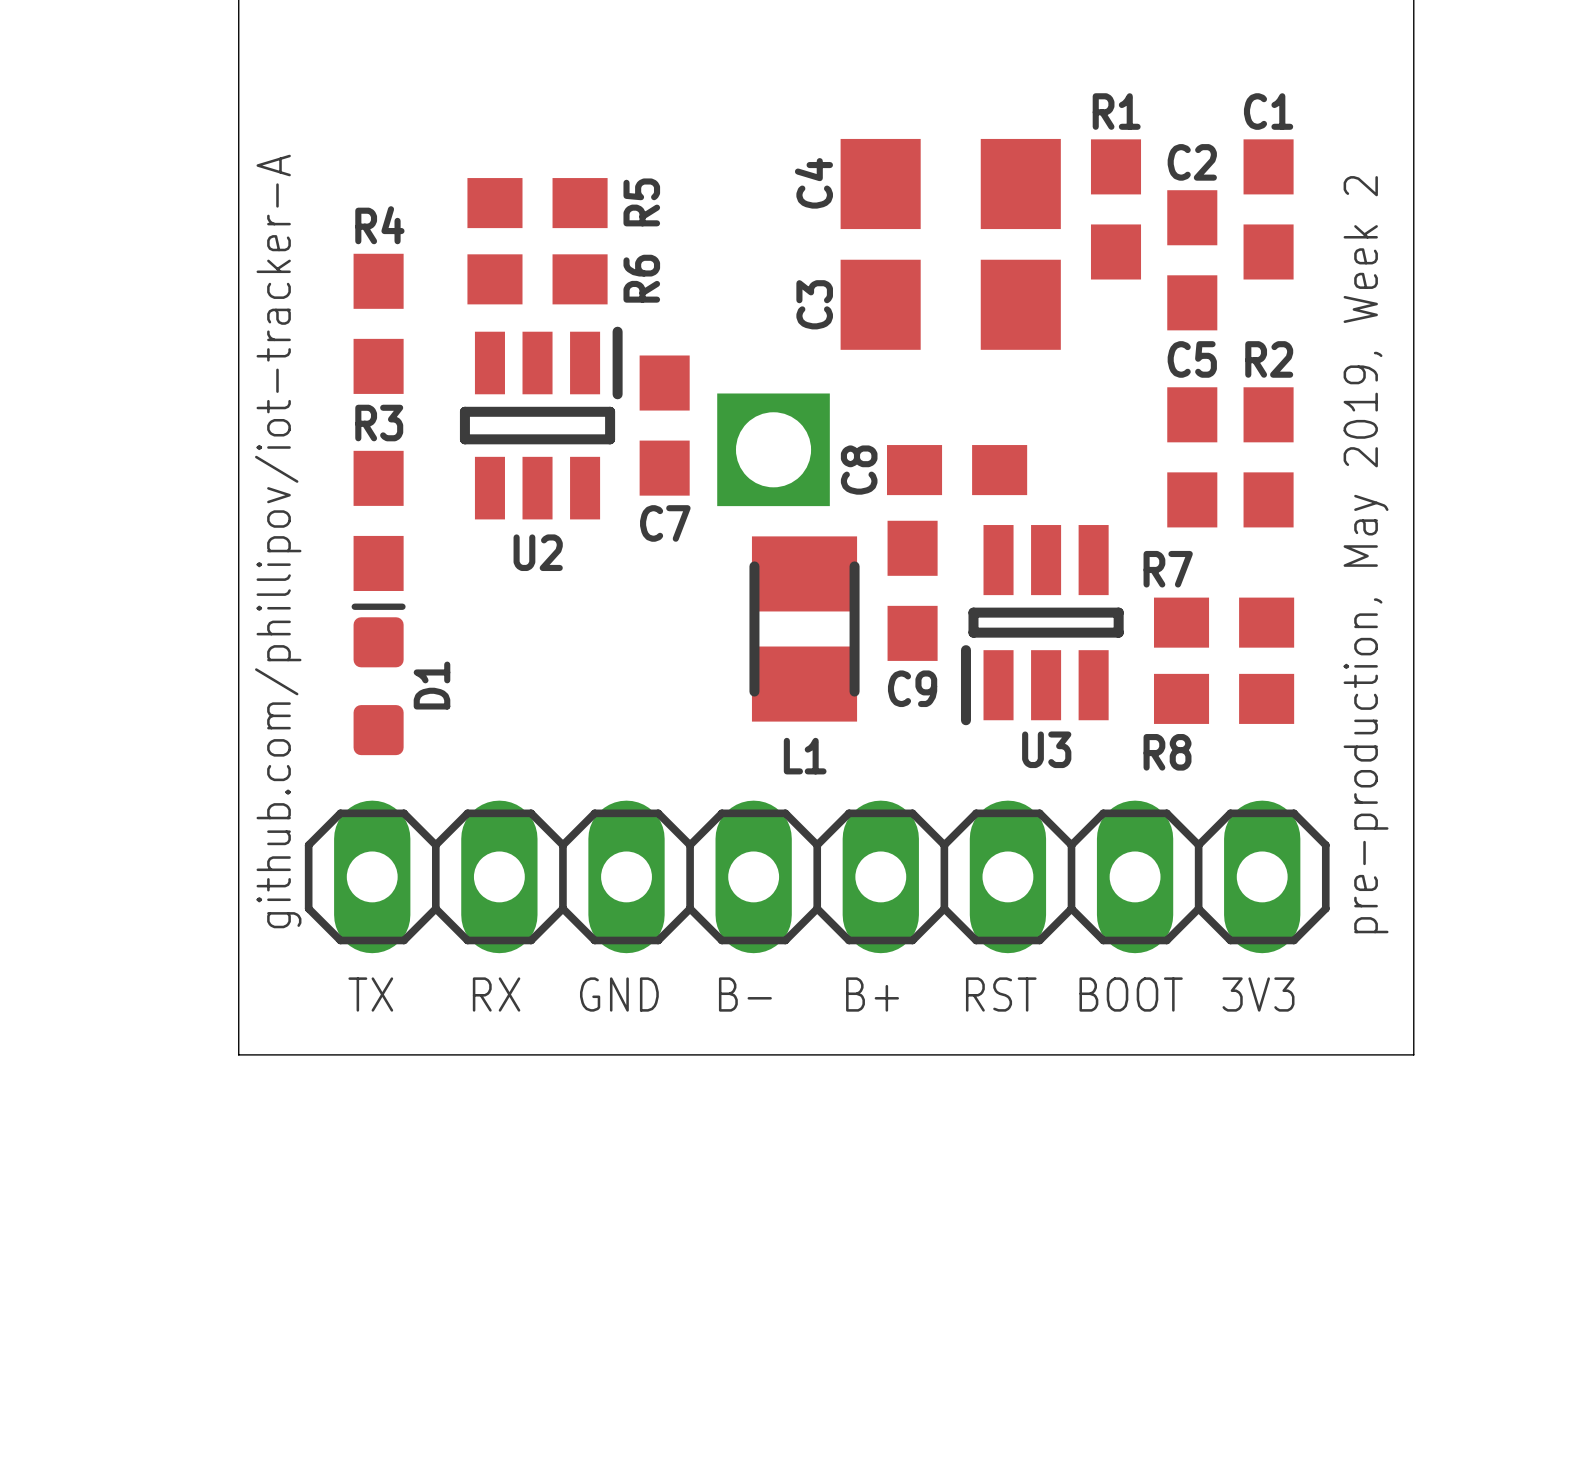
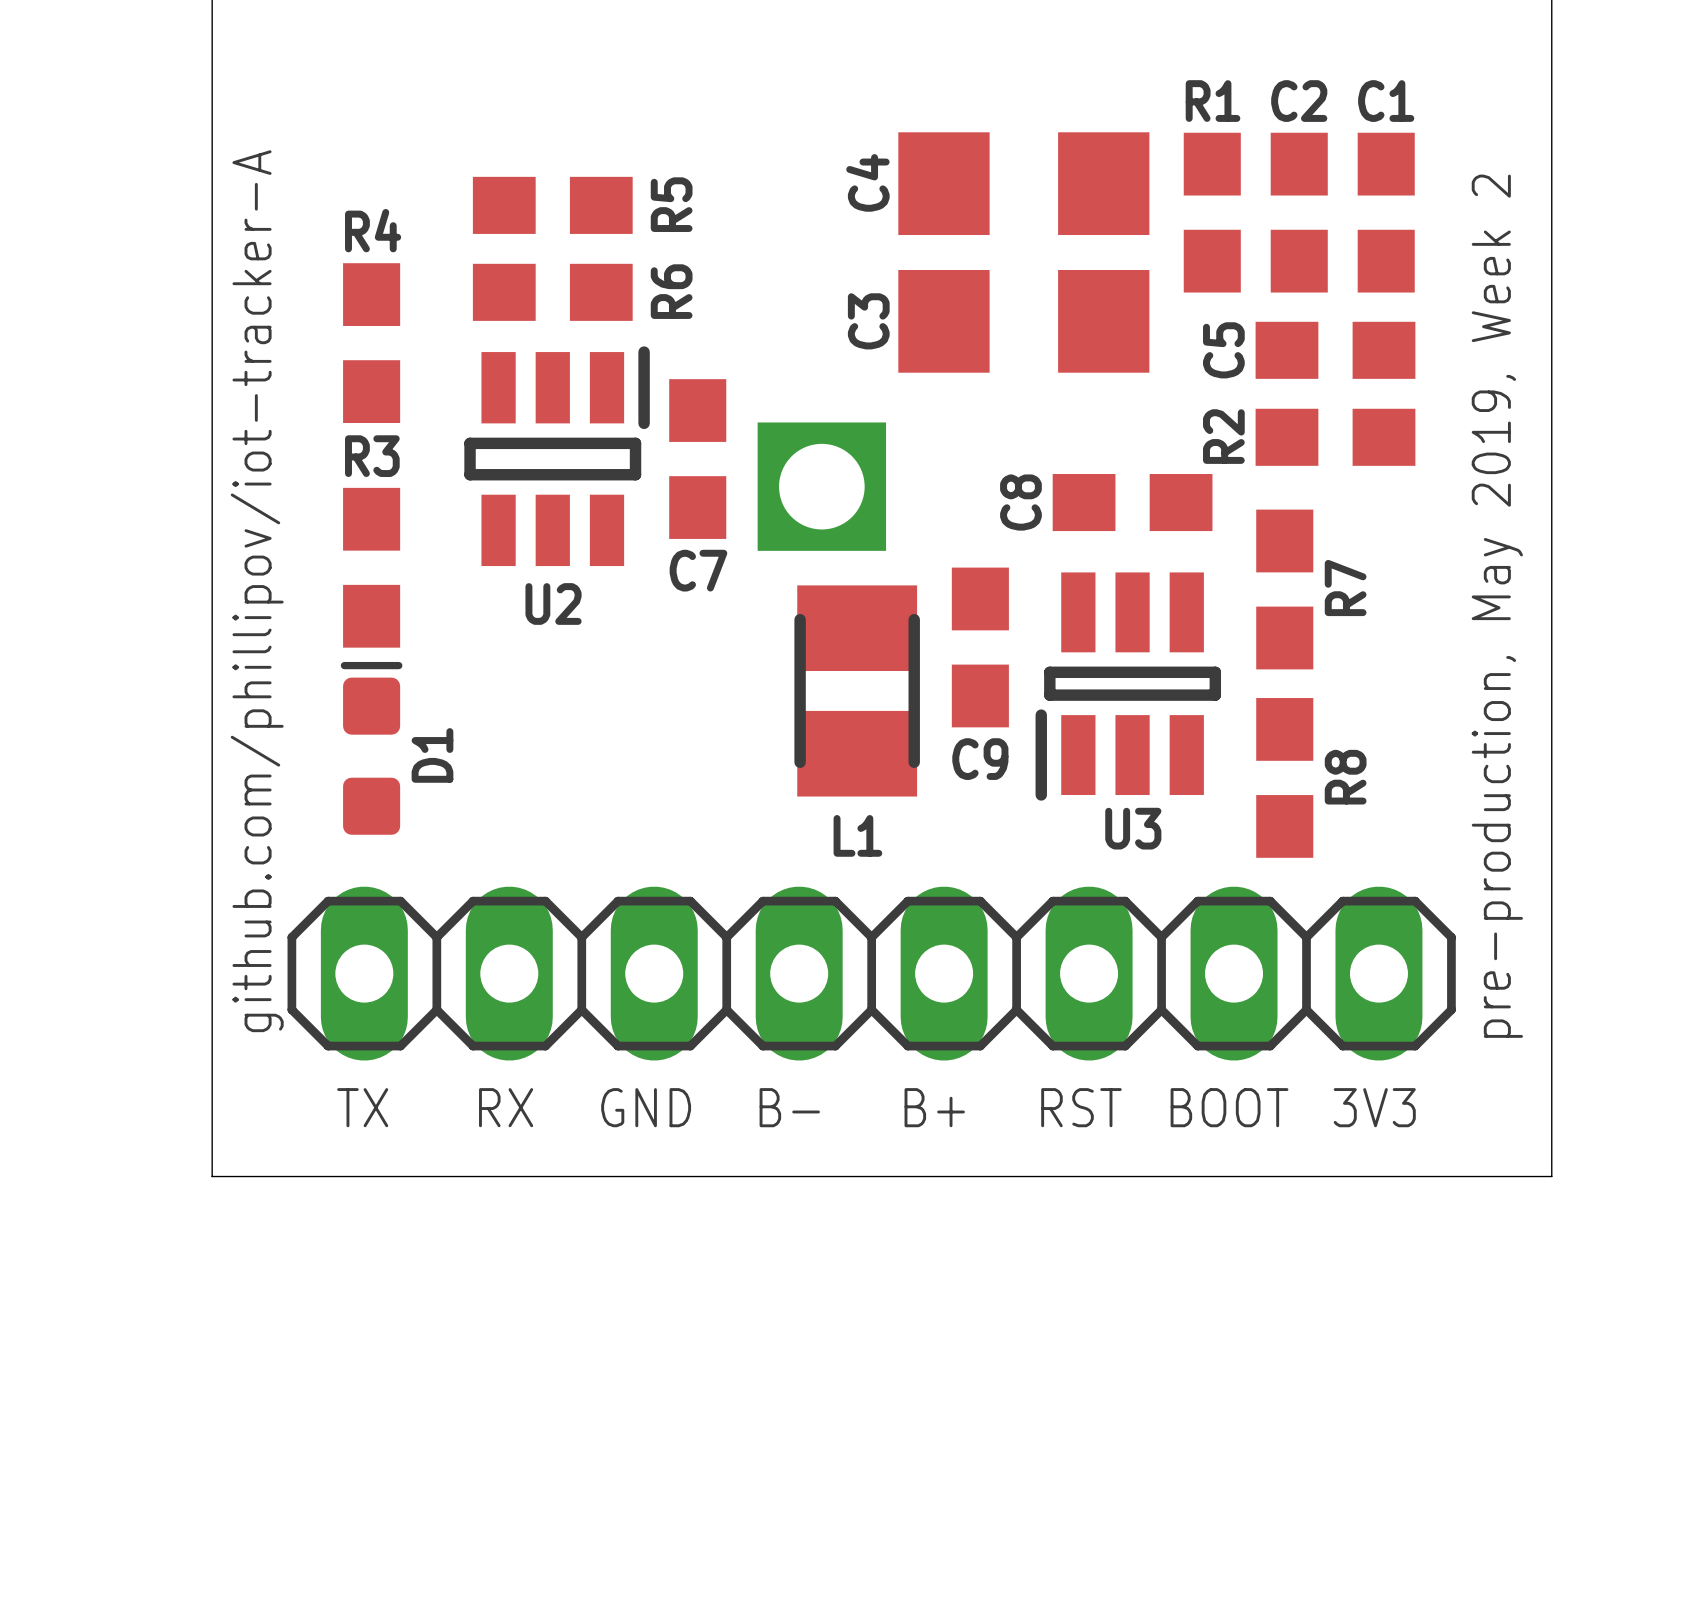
C2 position: (1192, 260) -> (1299, 212)
C5 name position: C5 (1192, 359) -> C5 (1223, 350)
R2 name position: R2 (1269, 359) -> R2 (1223, 436)
C5 rotation: 0° (1192, 457) -> 90° clockwise (1335, 350)
C5 position: (1192, 457) -> (1335, 350)
R2 rotation: 0° (1268, 457) -> 90° clockwise (1335, 437)
C8 position: (957, 470) -> (1132, 502)
R7 rotation: 0° (1224, 622) -> 90° clockwise (1284, 589)
R7 position: (1224, 622) -> (1284, 589)
R8 rotation: 0° (1224, 698) -> 90° clockwise (1284, 777)
R8 name position: R8 (1167, 752) -> R8 (1345, 777)

